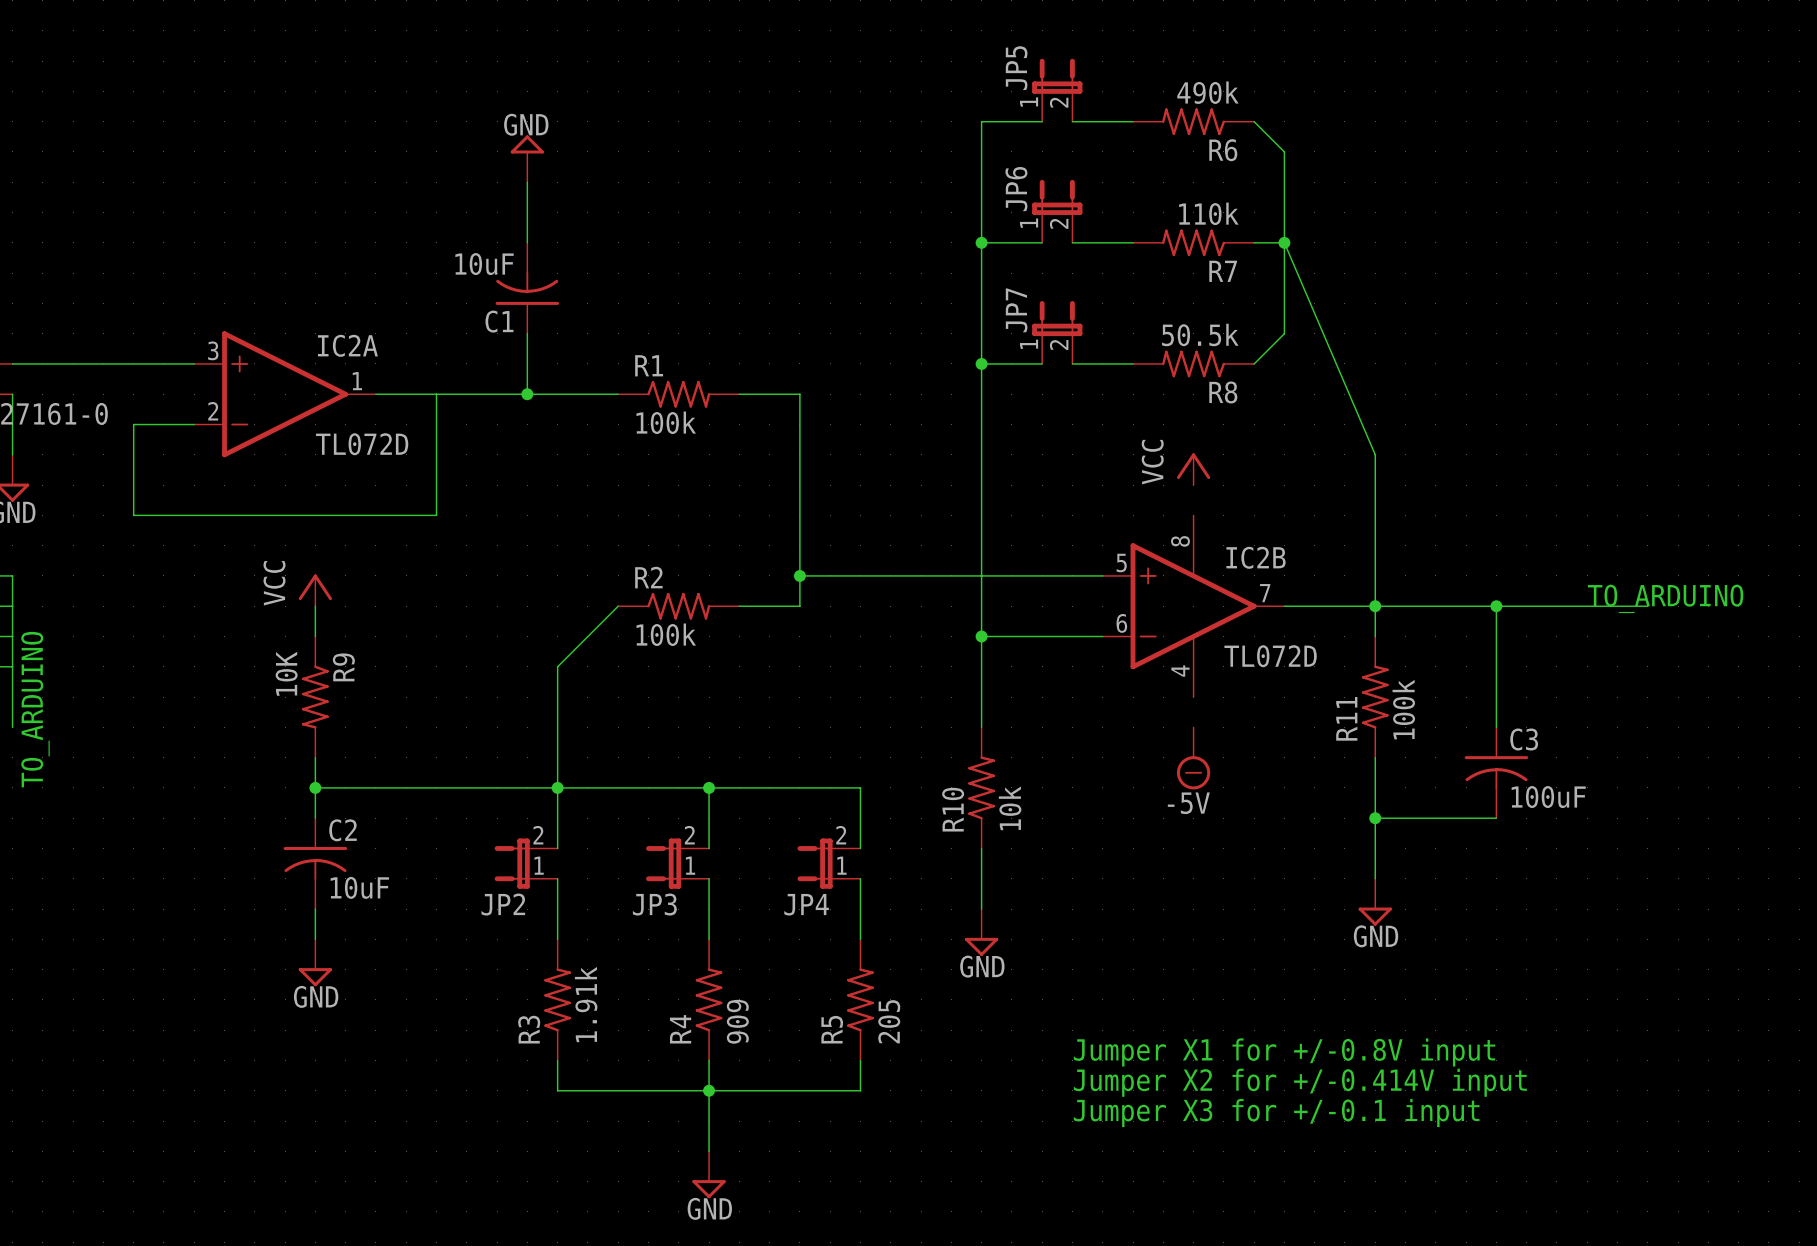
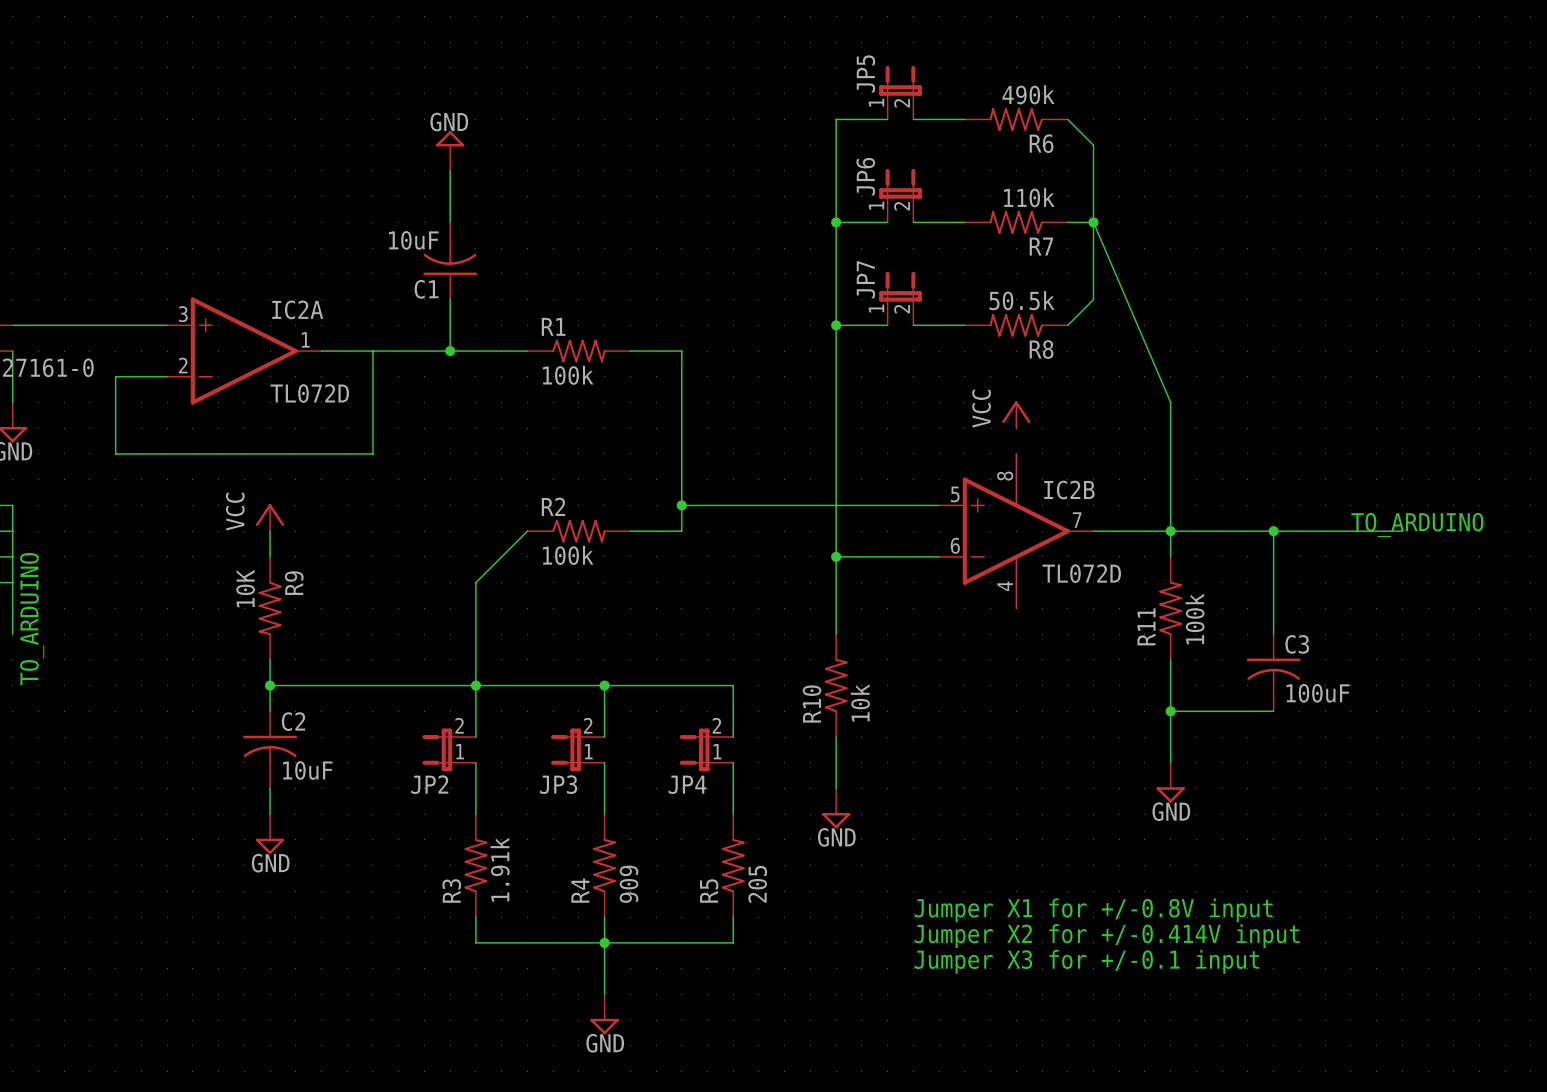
power symbol: -5V (1193, 758) -> none

